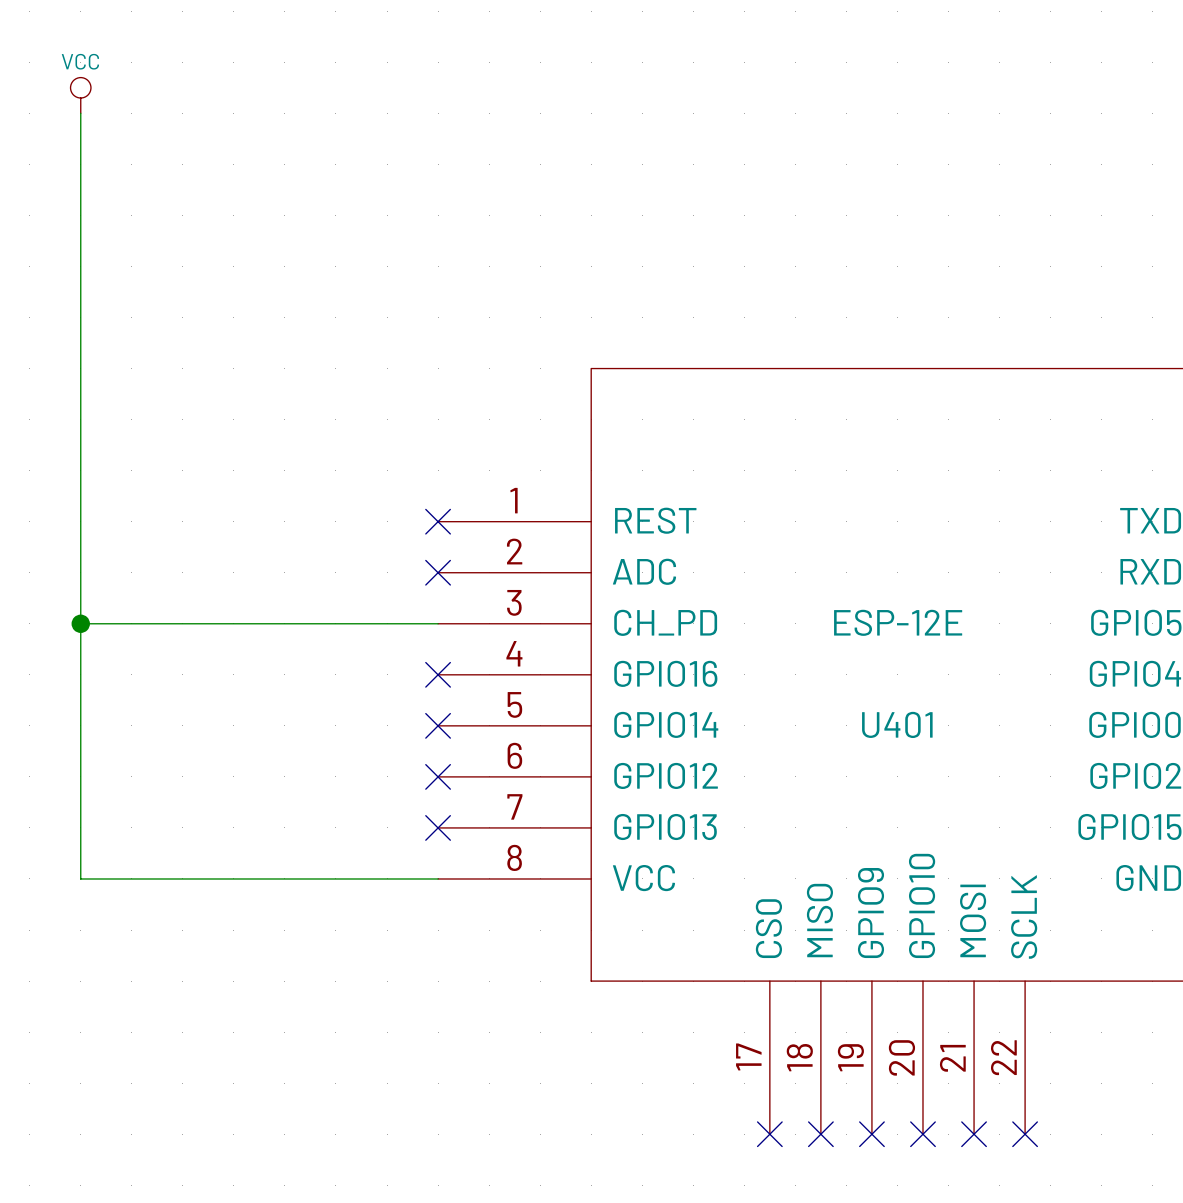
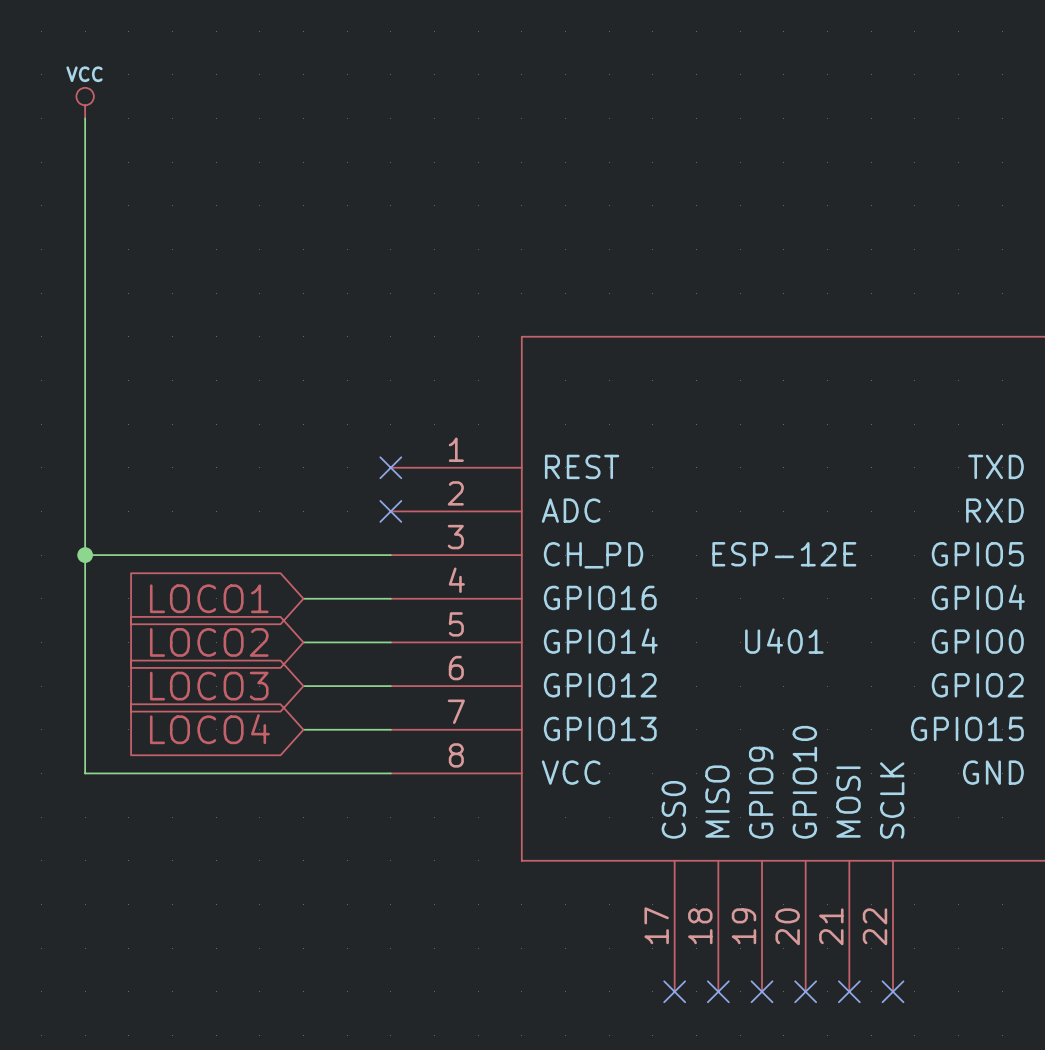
global label: none -> LOCO1 (209, 598)
wire: none -> (303, 598) (390, 598)
no-connect mark: (438, 674) -> none
global label: none -> LOCO2 (209, 642)
wire: none -> (303, 642) (390, 642)
no-connect mark: (438, 725) -> none
global label: none -> LOCO3 (209, 686)
wire: none -> (303, 686) (390, 686)
no-connect mark: (438, 776) -> none
global label: none -> LOCO4 (209, 729)
wire: none -> (303, 729) (390, 729)
no-connect mark: (438, 827) -> none

